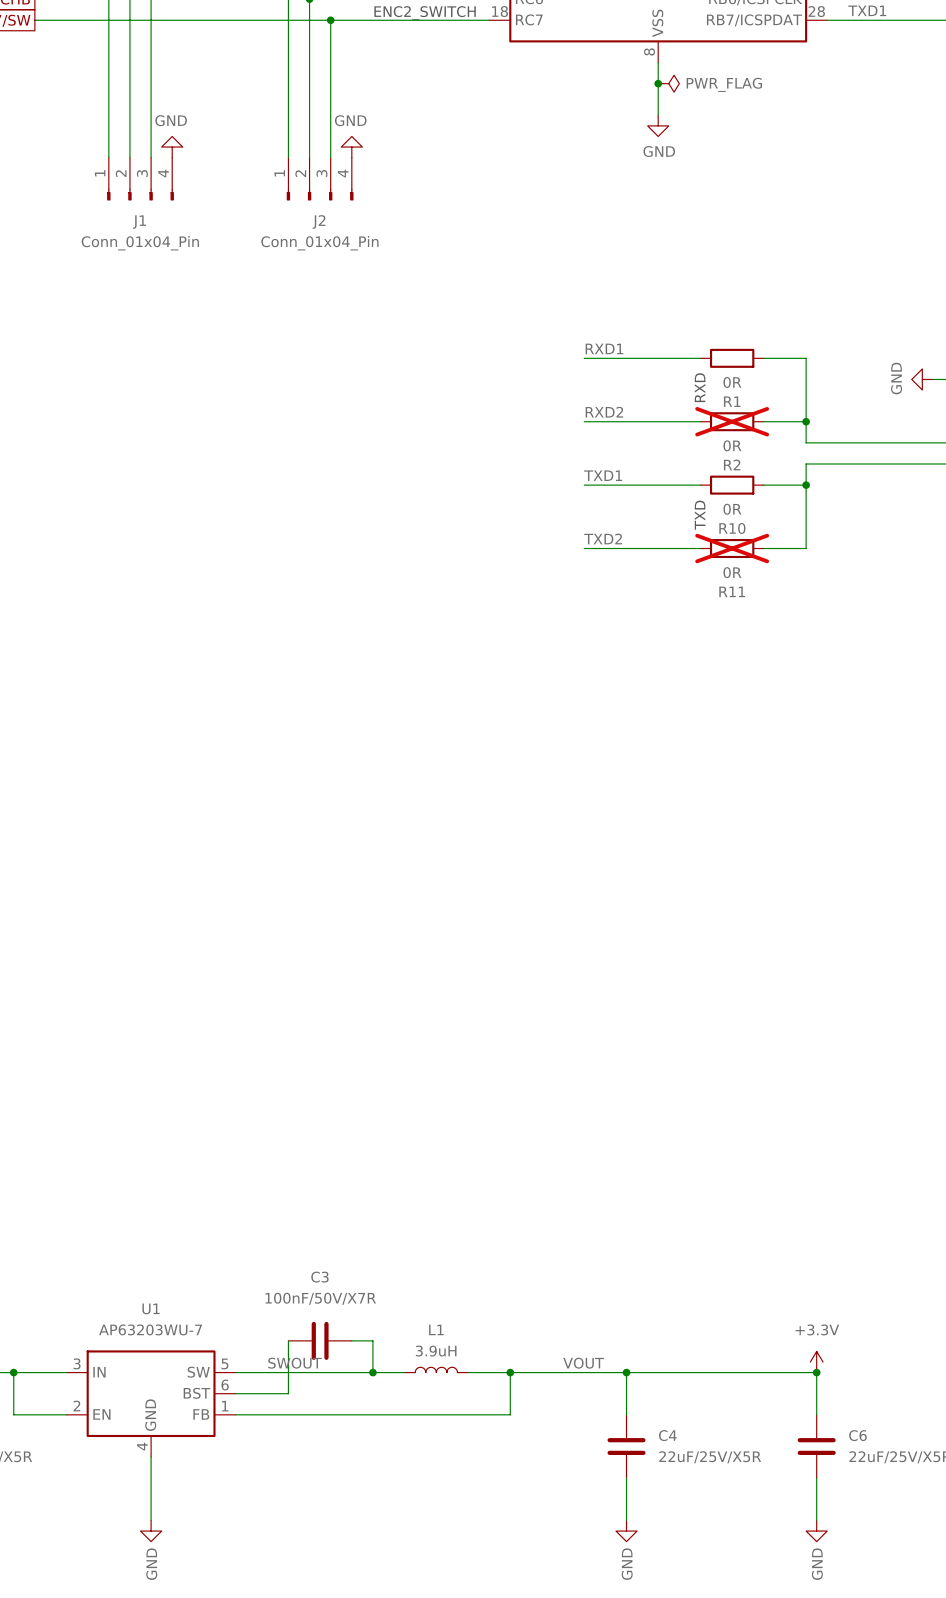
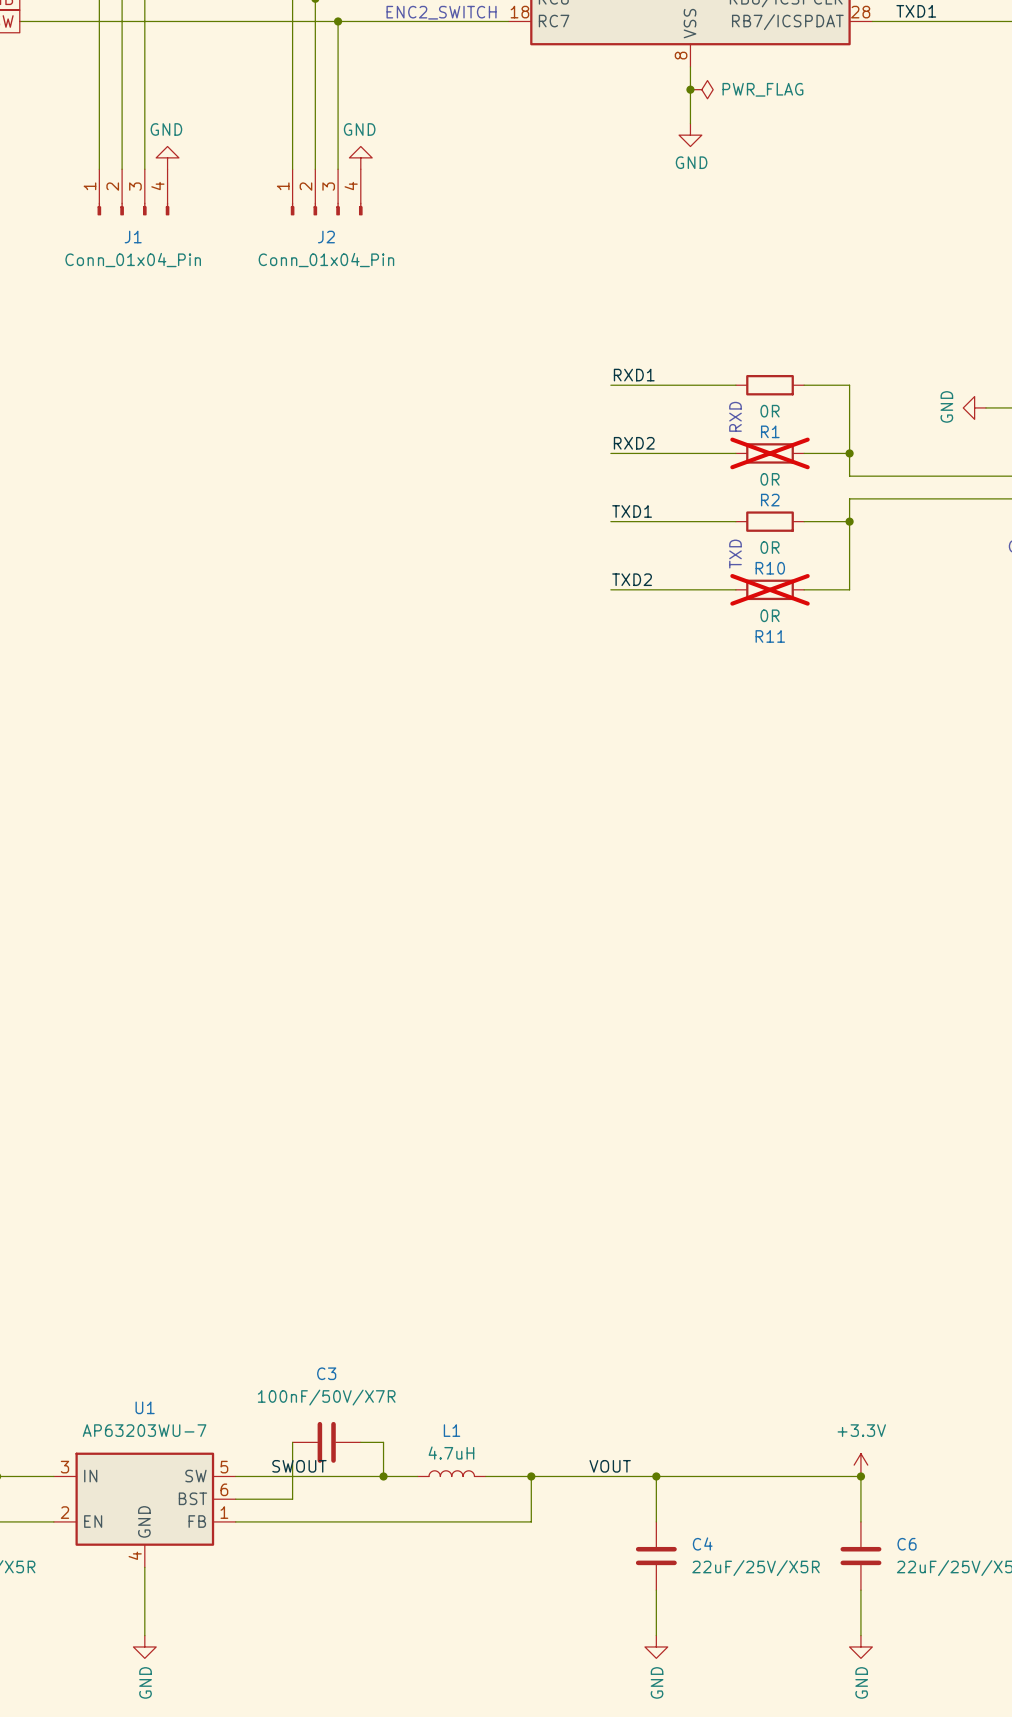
L1 value: 3.9uH (436, 1351) -> 4.7uH (451, 1453)

